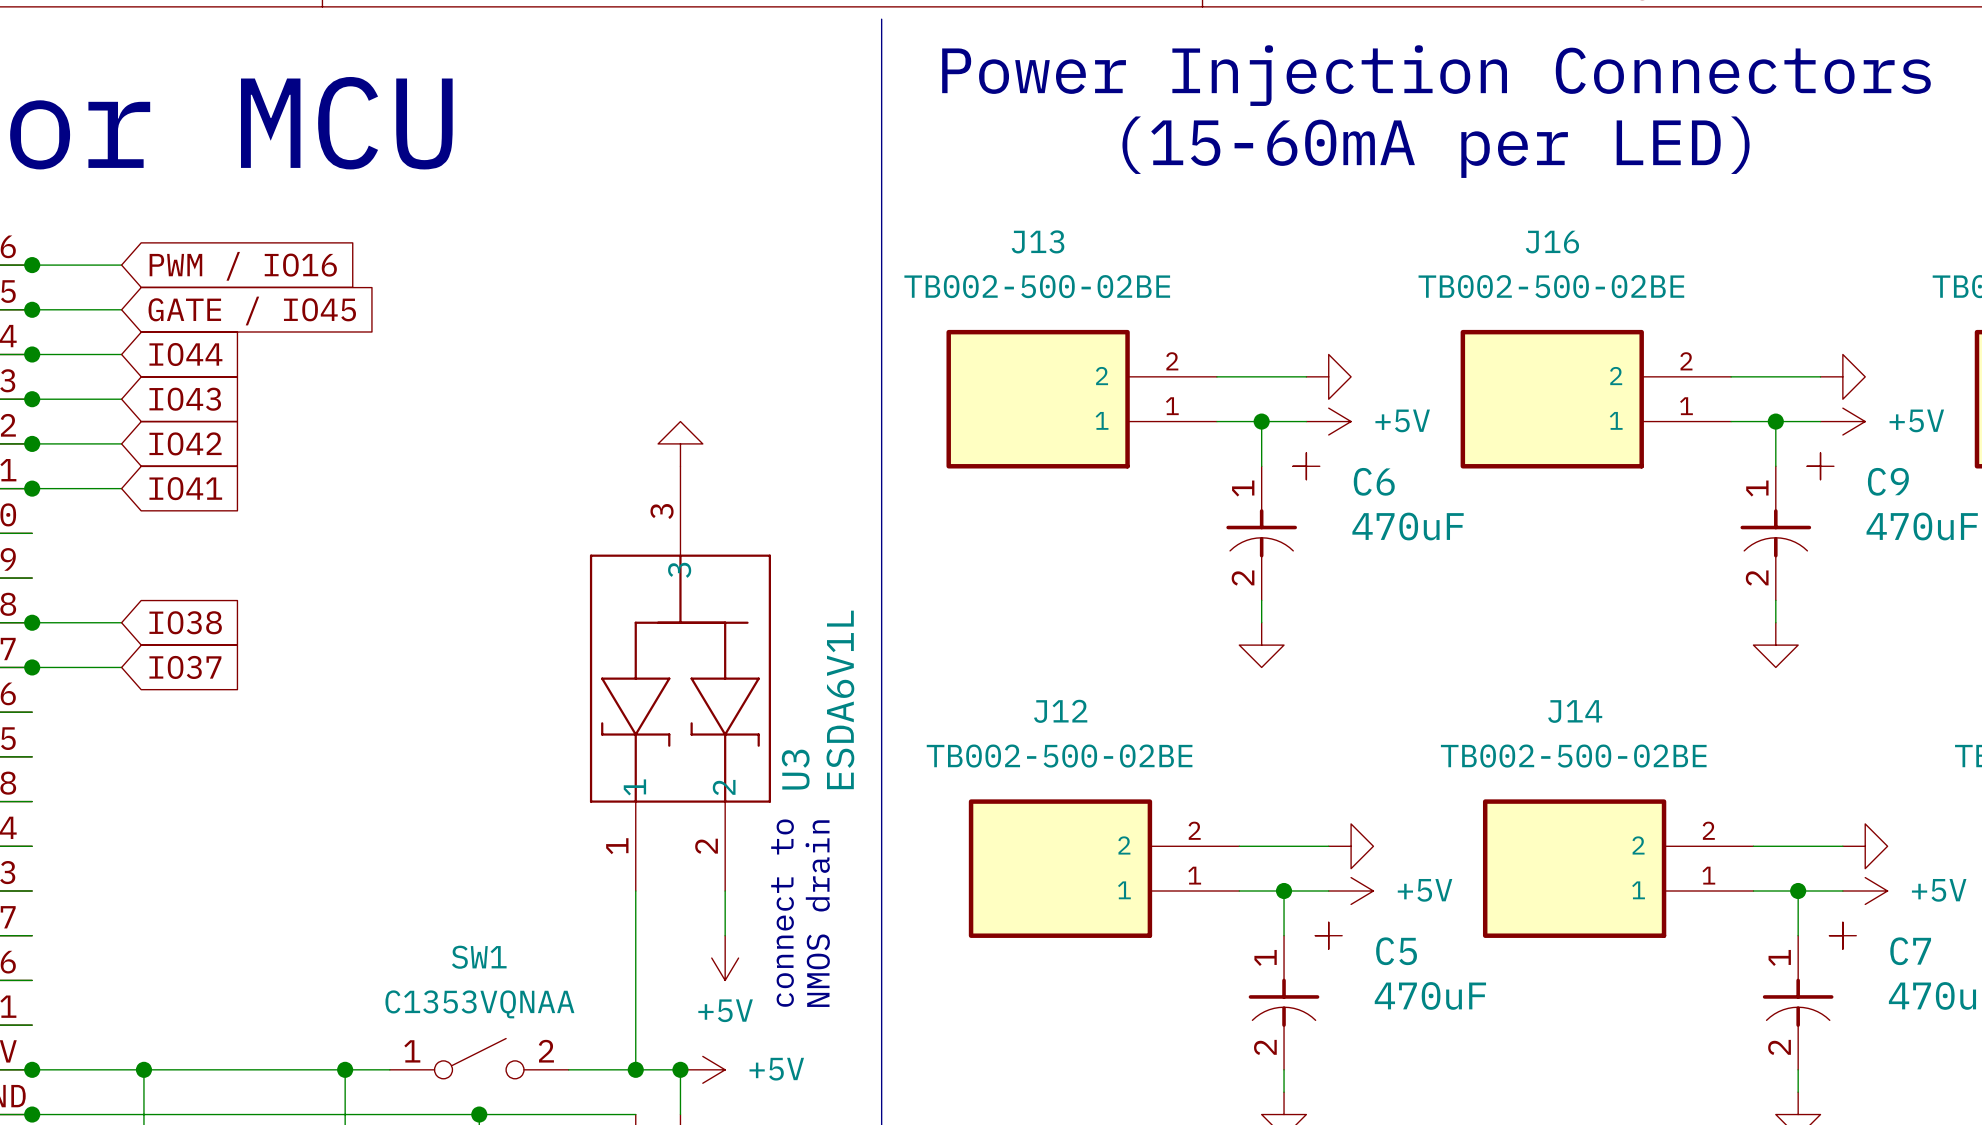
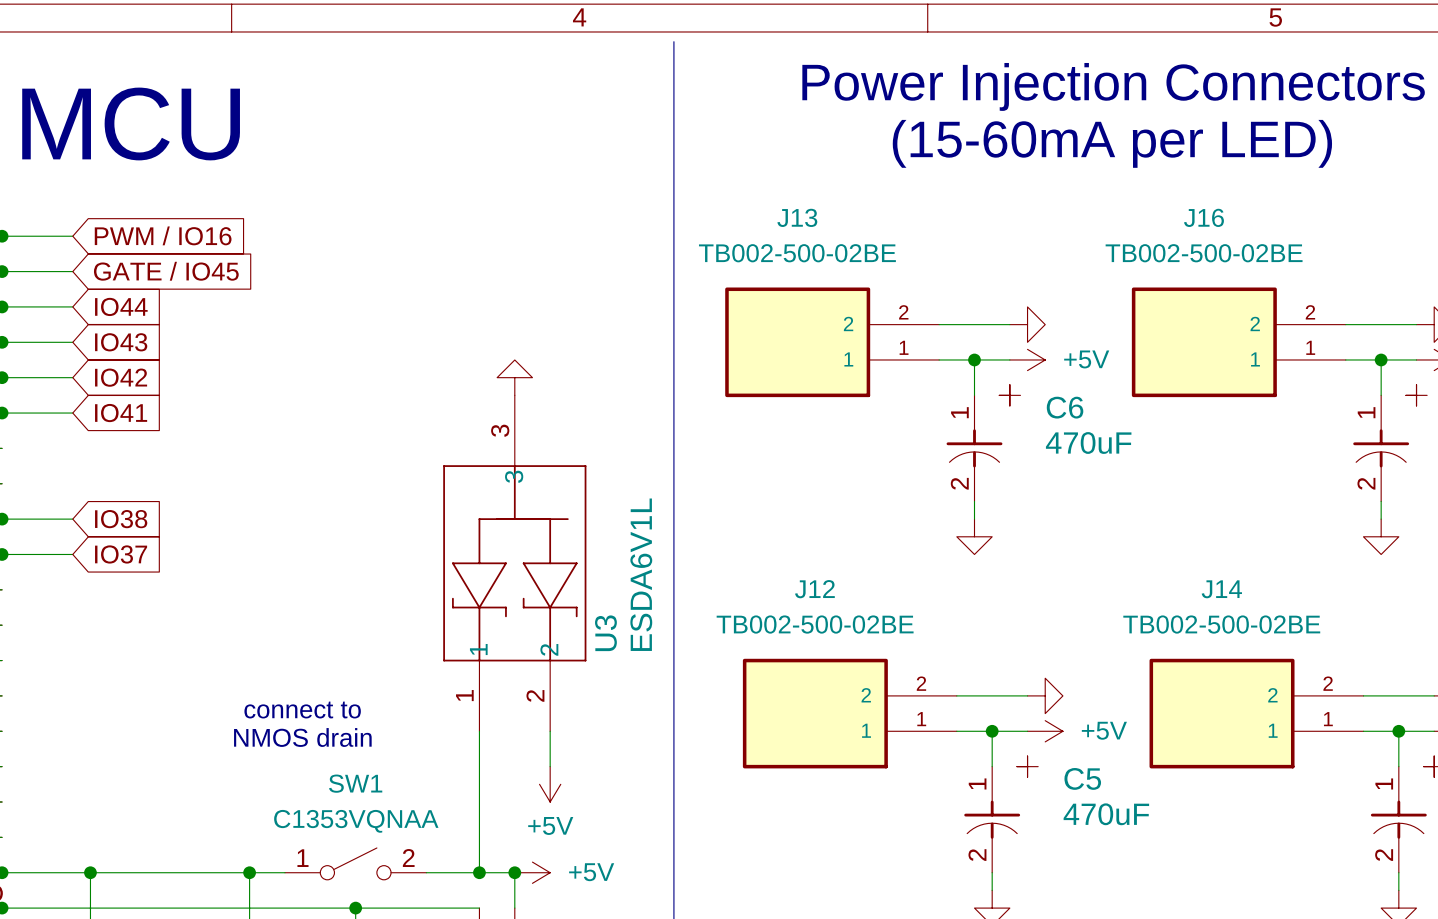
text rotation: 0° (782, 913) -> 90° clockwise (302, 710)
text position: connect to (782, 913) -> connect to (302, 710)
text rotation: 0° (817, 913) -> 90° clockwise (302, 737)
text position: NMOS drain (817, 913) -> NMOS drain (302, 737)

